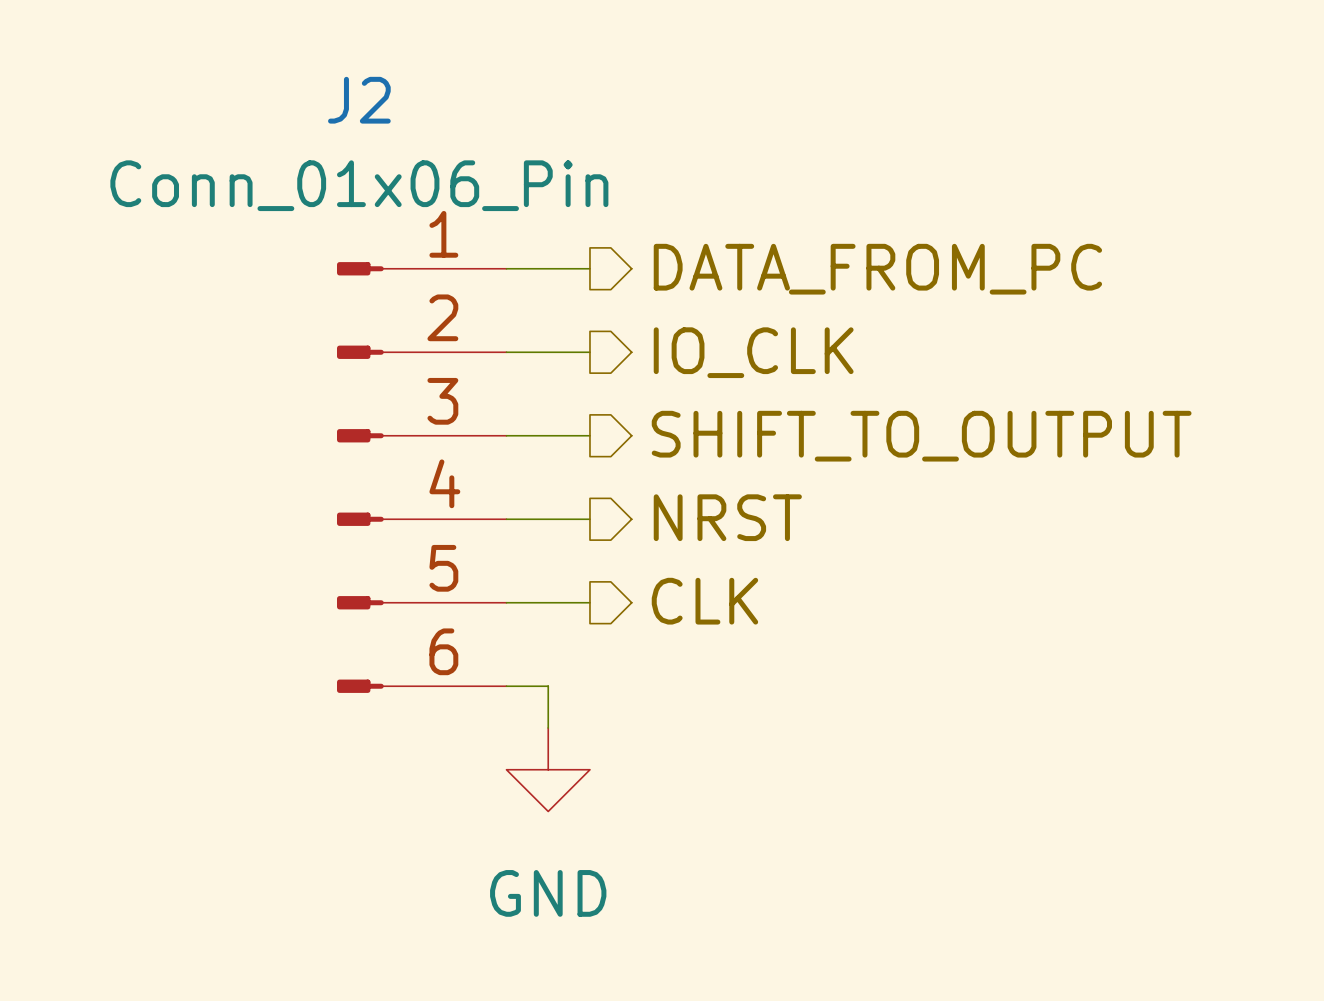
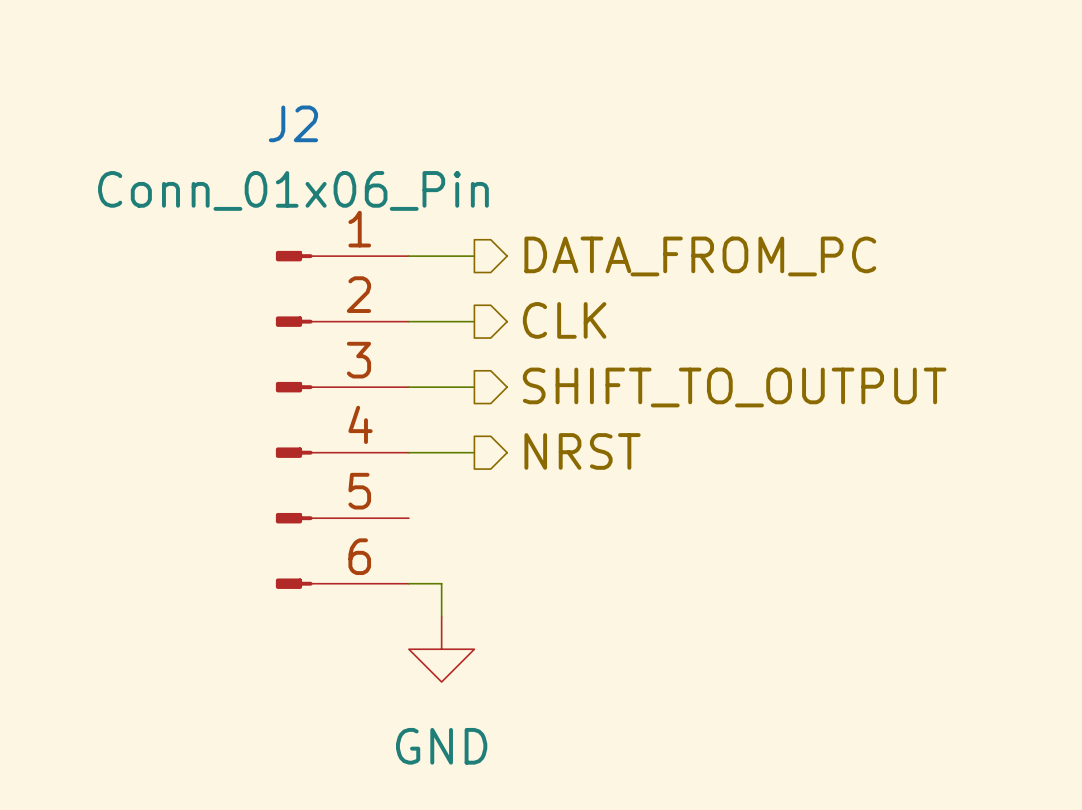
hierarchical label: IO_CLK (753, 352) -> CLK (564, 320)
hierarchical label: CLK (704, 601) -> none
wire: (506, 602) (589, 602) -> none

